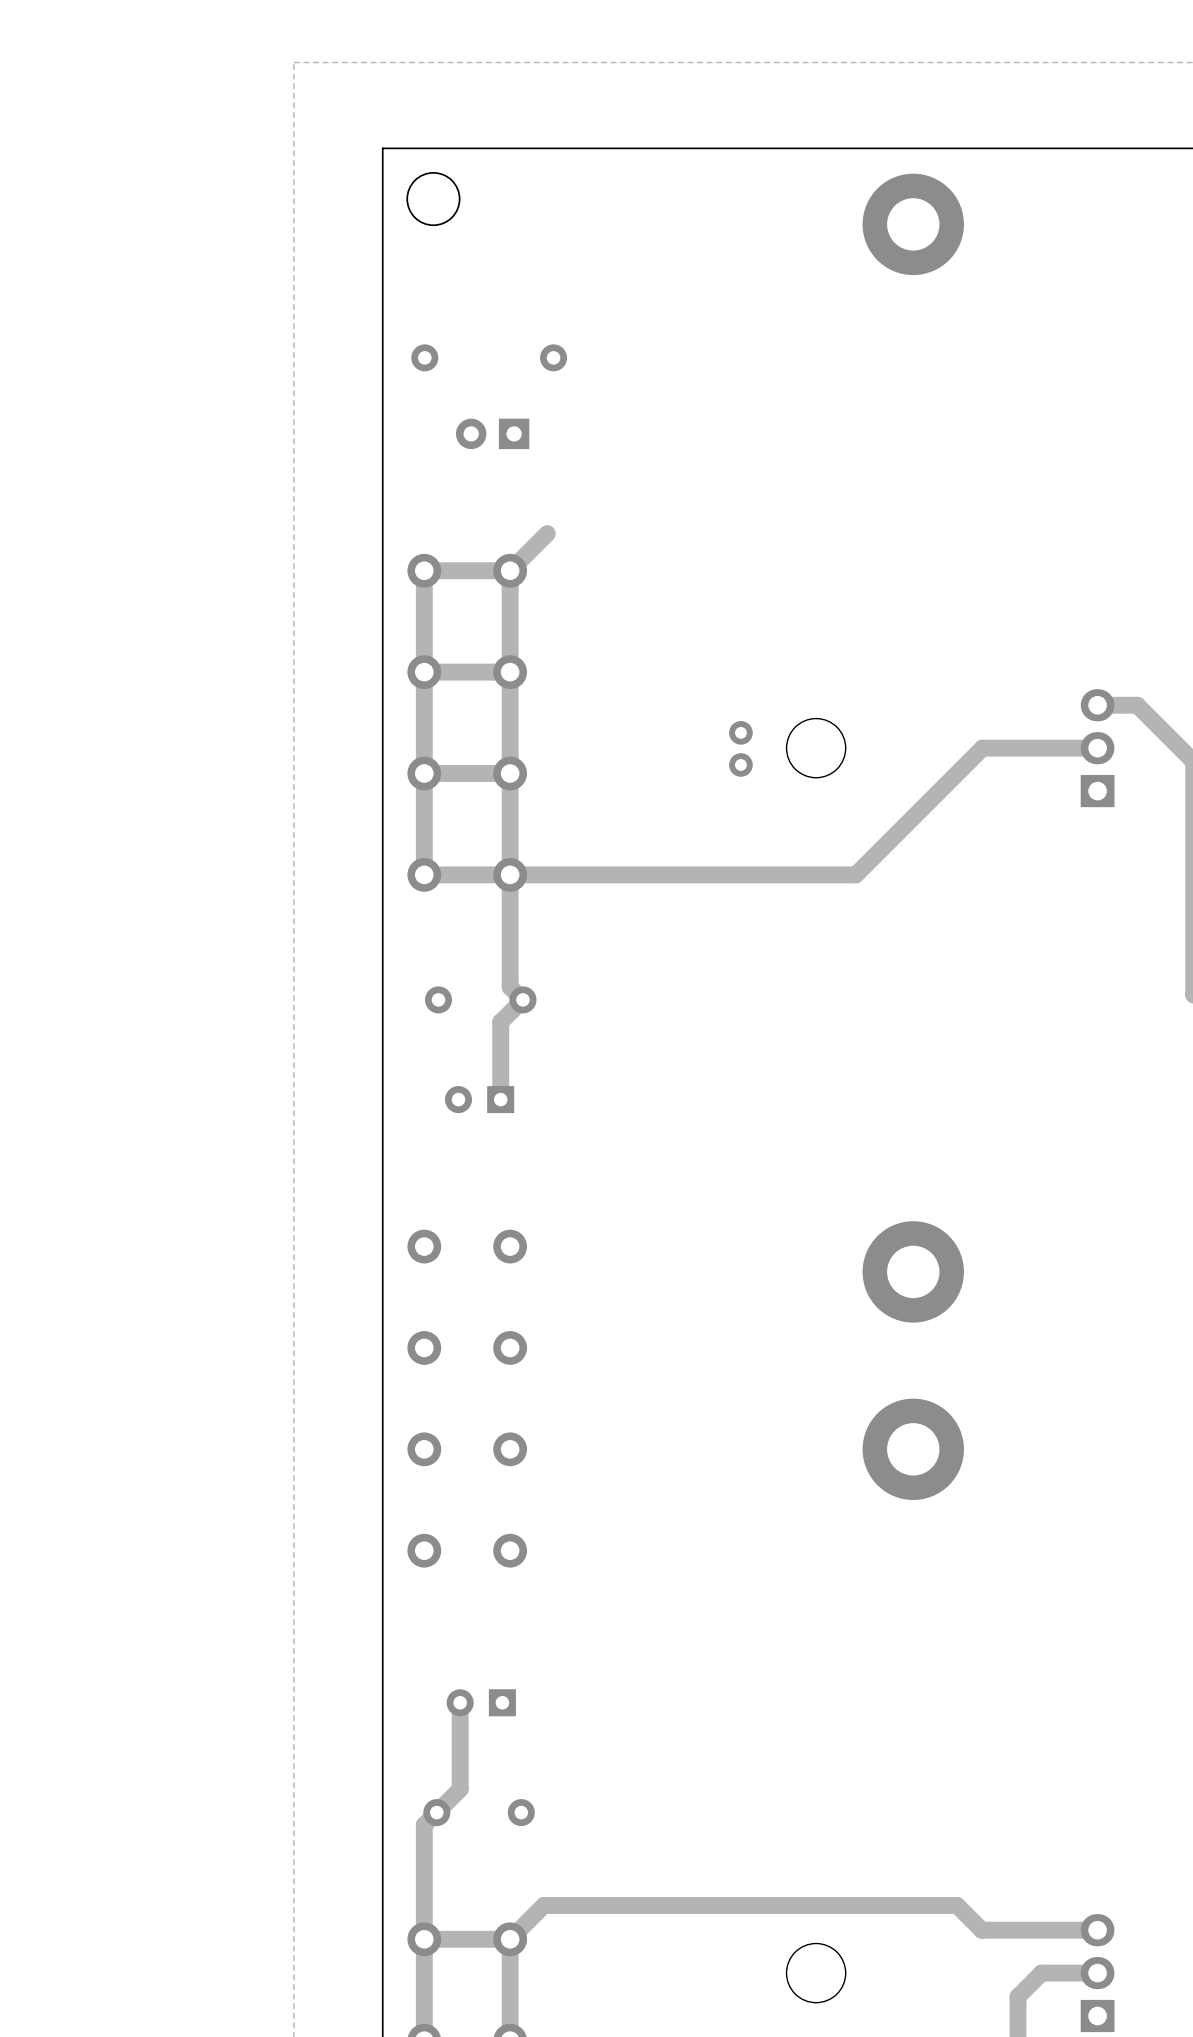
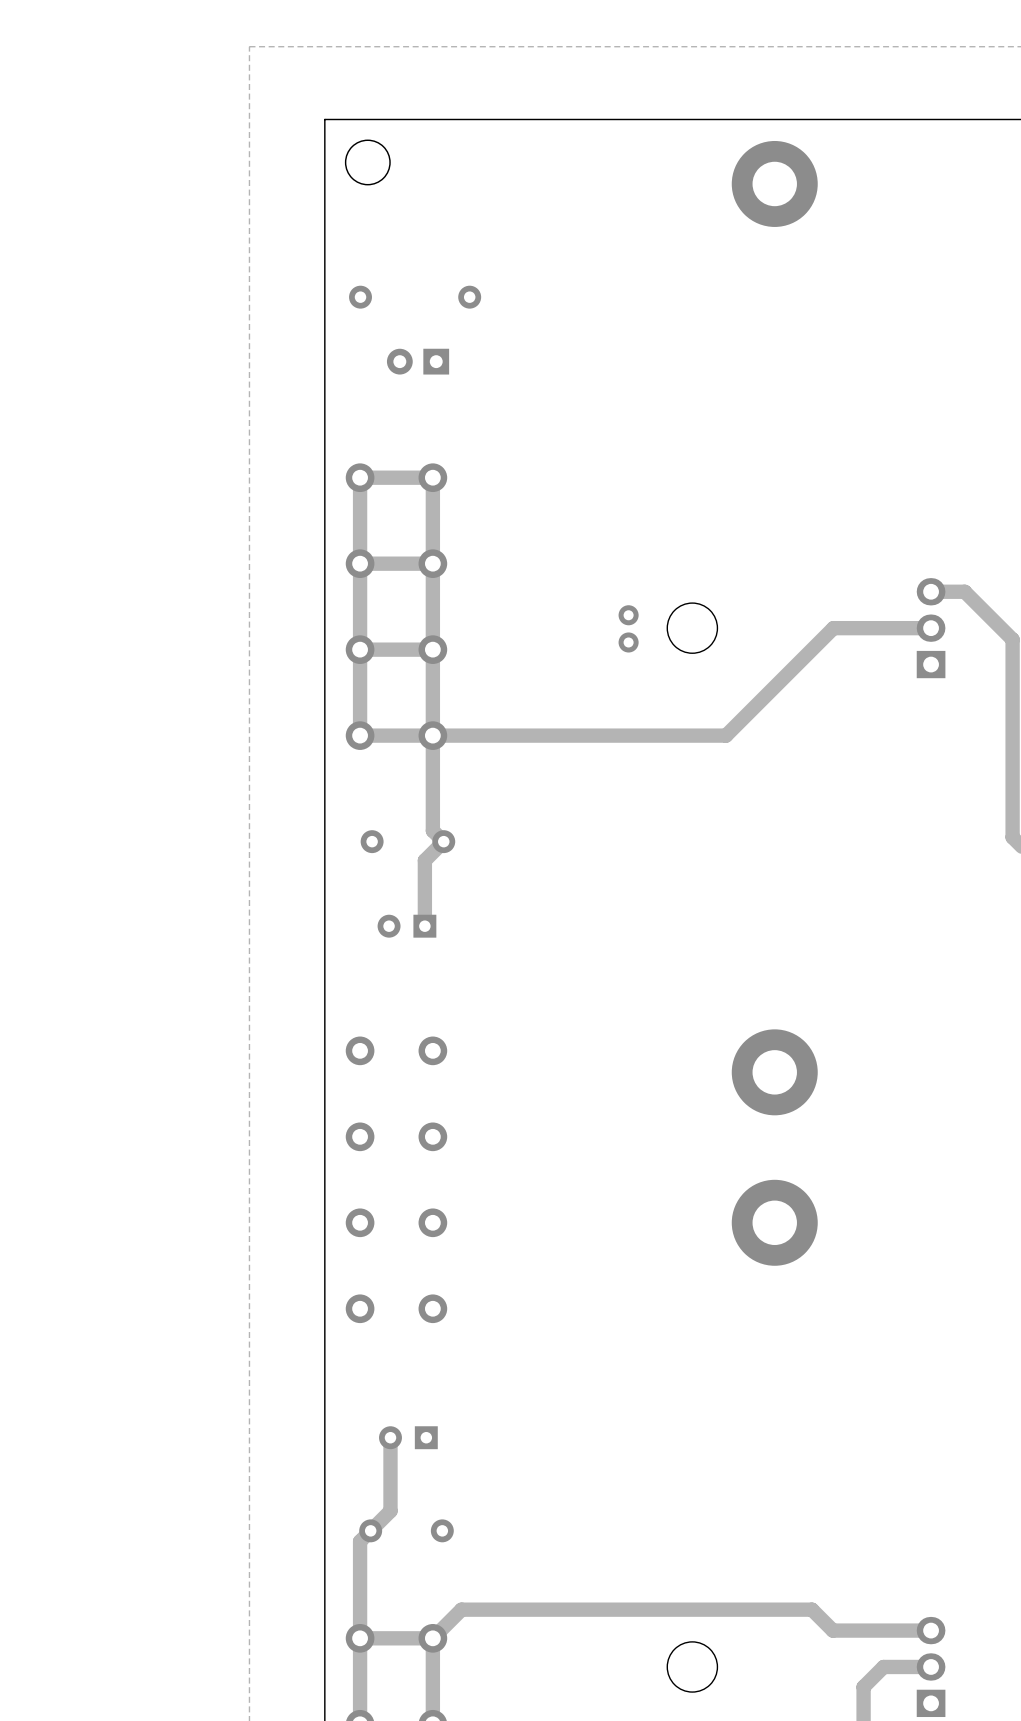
track: (547, 533) (510, 570) -> none

